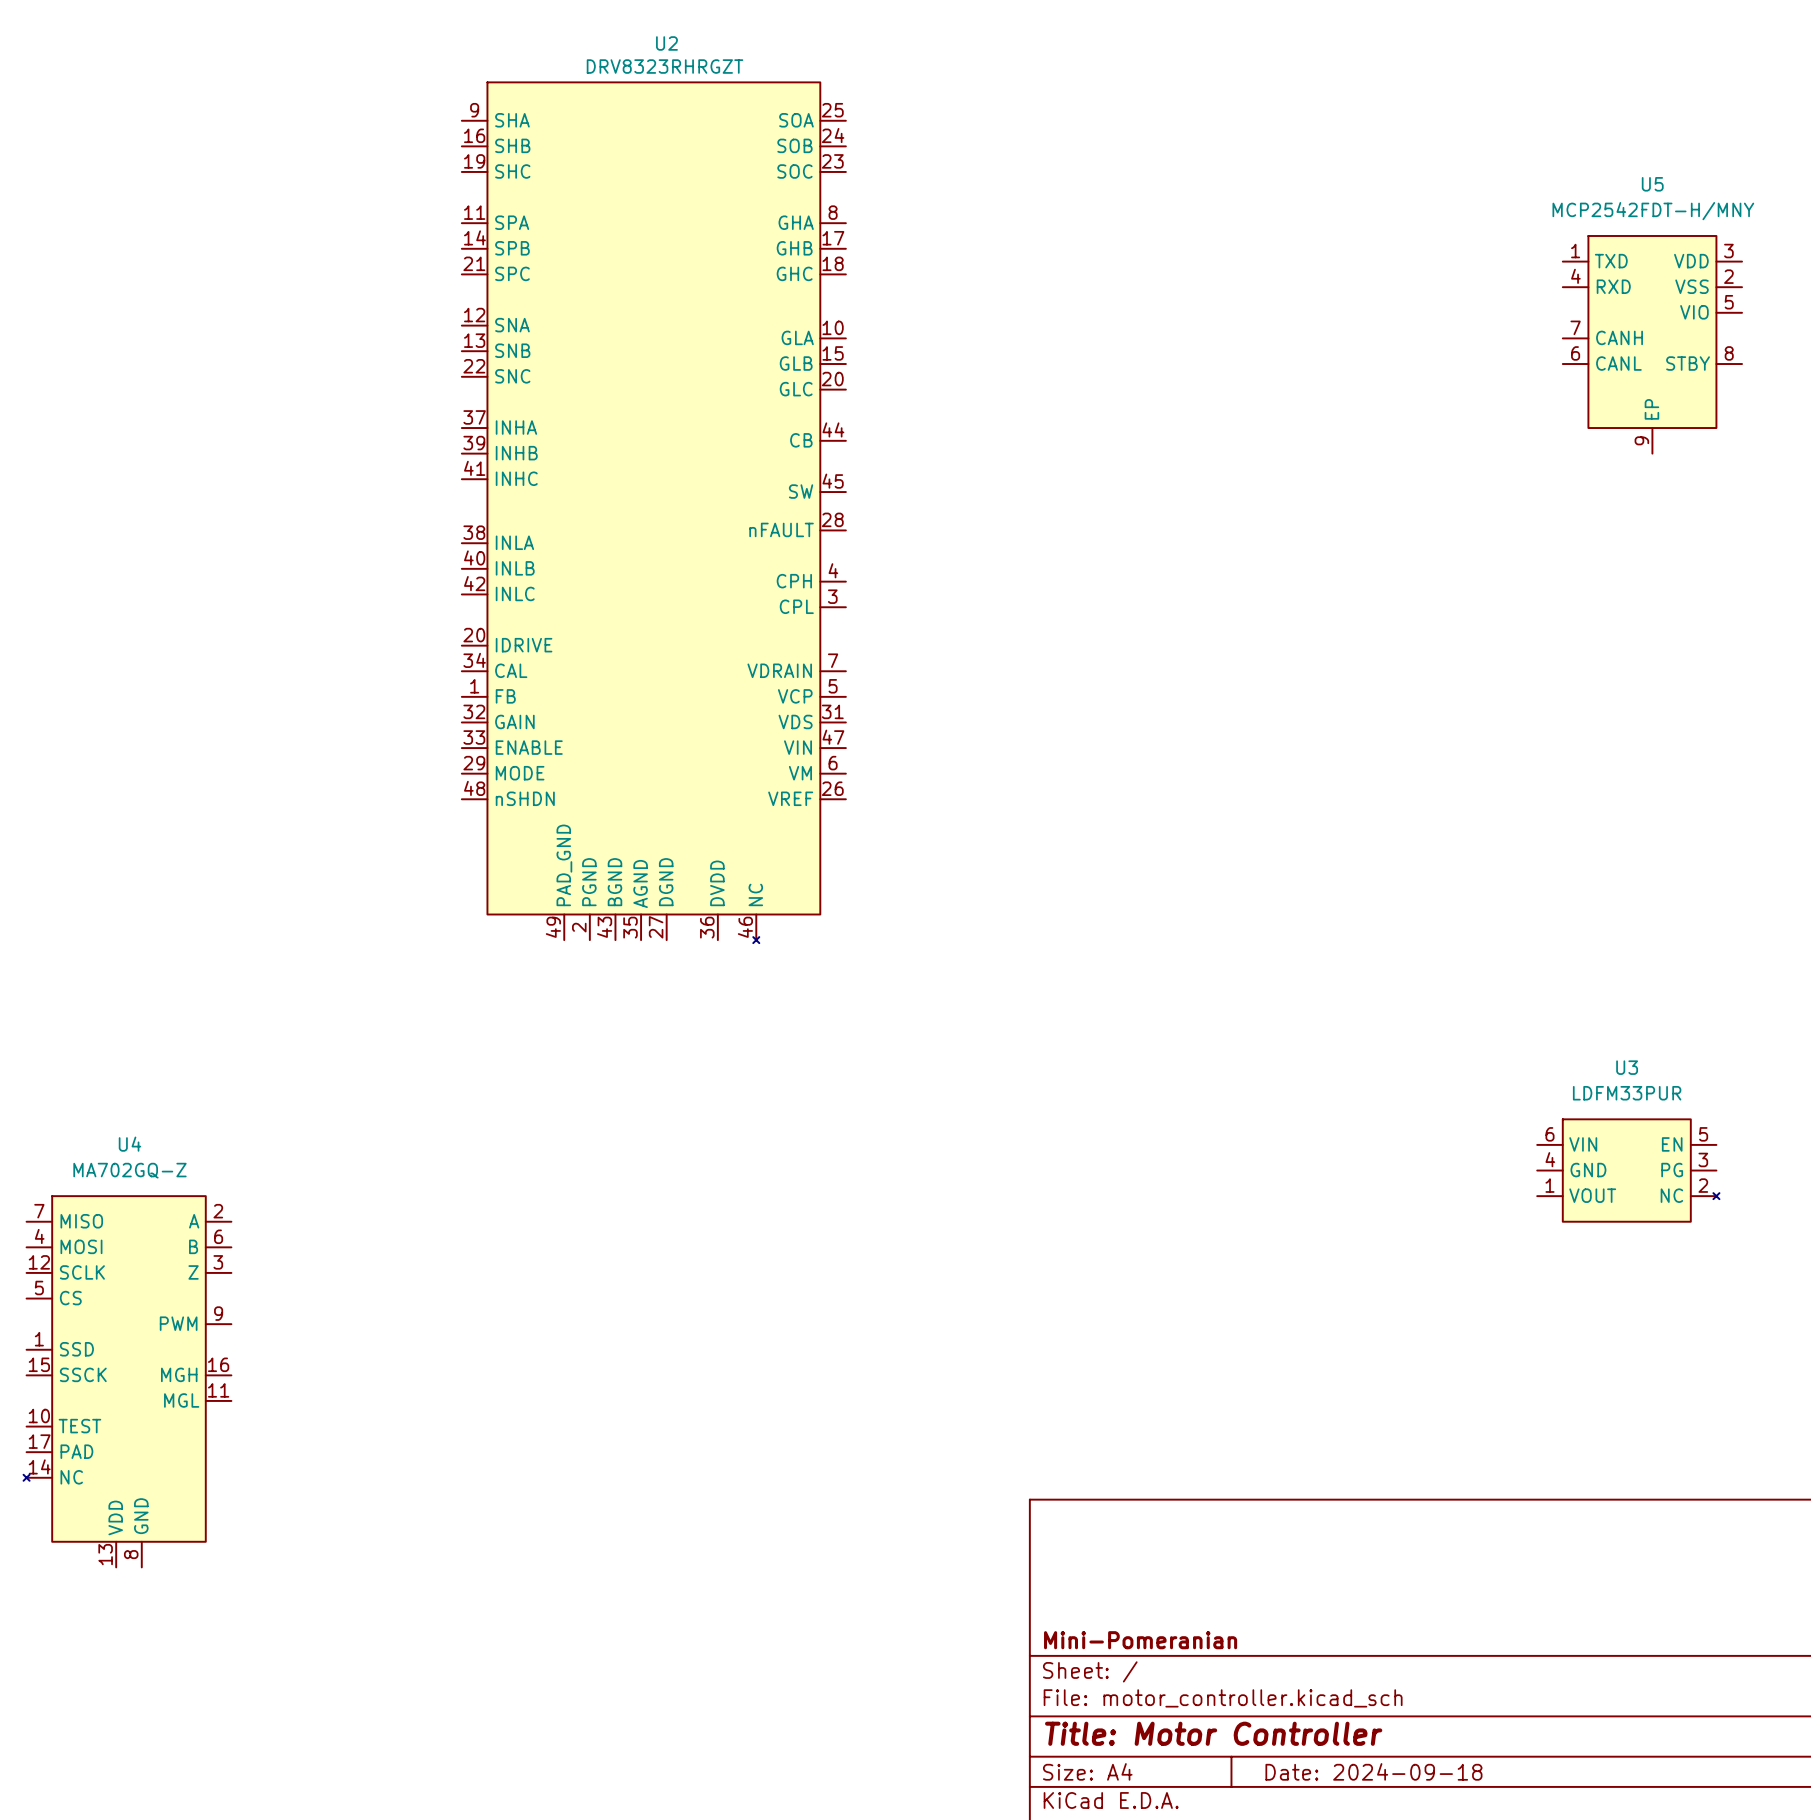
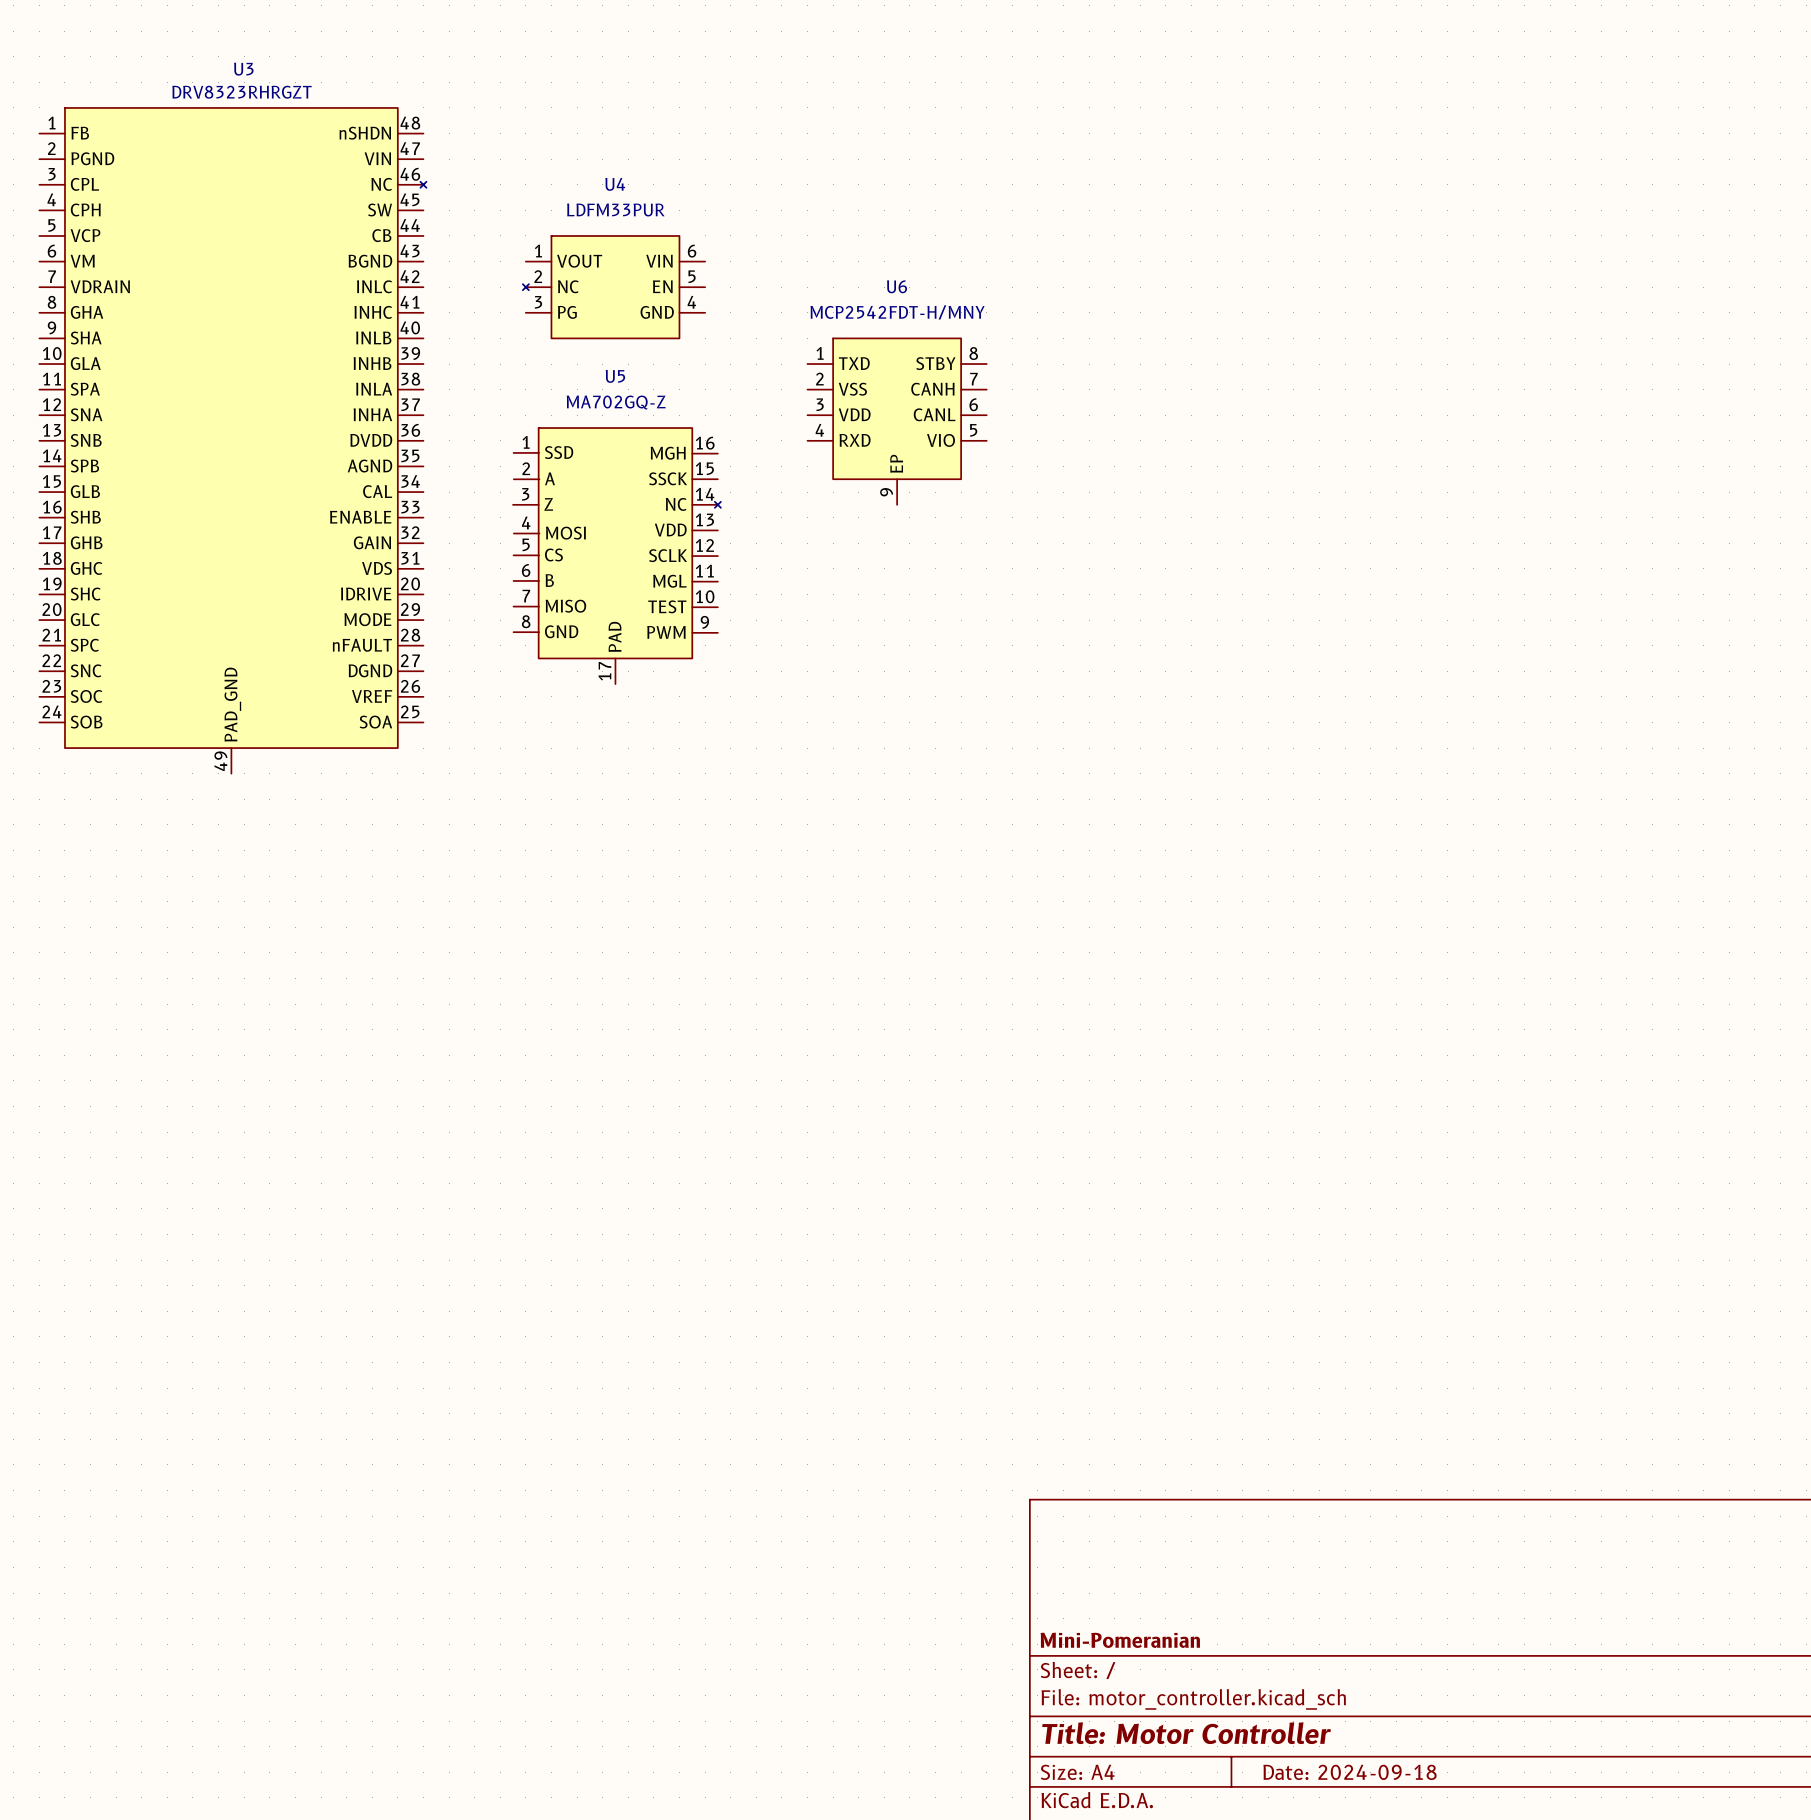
U5 value: MCP2542FDT-H/MNY (1653, 211) -> MA702GQ-Z (616, 402)
U5 symbol: [1562, 235, 1743, 454] -> [513, 428, 721, 685]
U6: none -> MCP2542FDT-H/MNY (897, 421)
U2: DRV8323RHRGZT (653, 512) -> none
U3 name position: U3 (1627, 1067) -> U3 (243, 69)
U3 value: LDFM33PUR (1627, 1093) -> DRV8323RHRGZT (242, 92)
U3 symbol: [1537, 1119, 1720, 1222] -> [39, 107, 427, 774]
U4 name position: U4 (129, 1144) -> U4 (615, 184)
U4 value: MA702GQ-Z (129, 1170) -> LDFM33PUR (615, 209)
U4 symbol: [23, 1196, 232, 1568] -> [522, 235, 706, 339]

